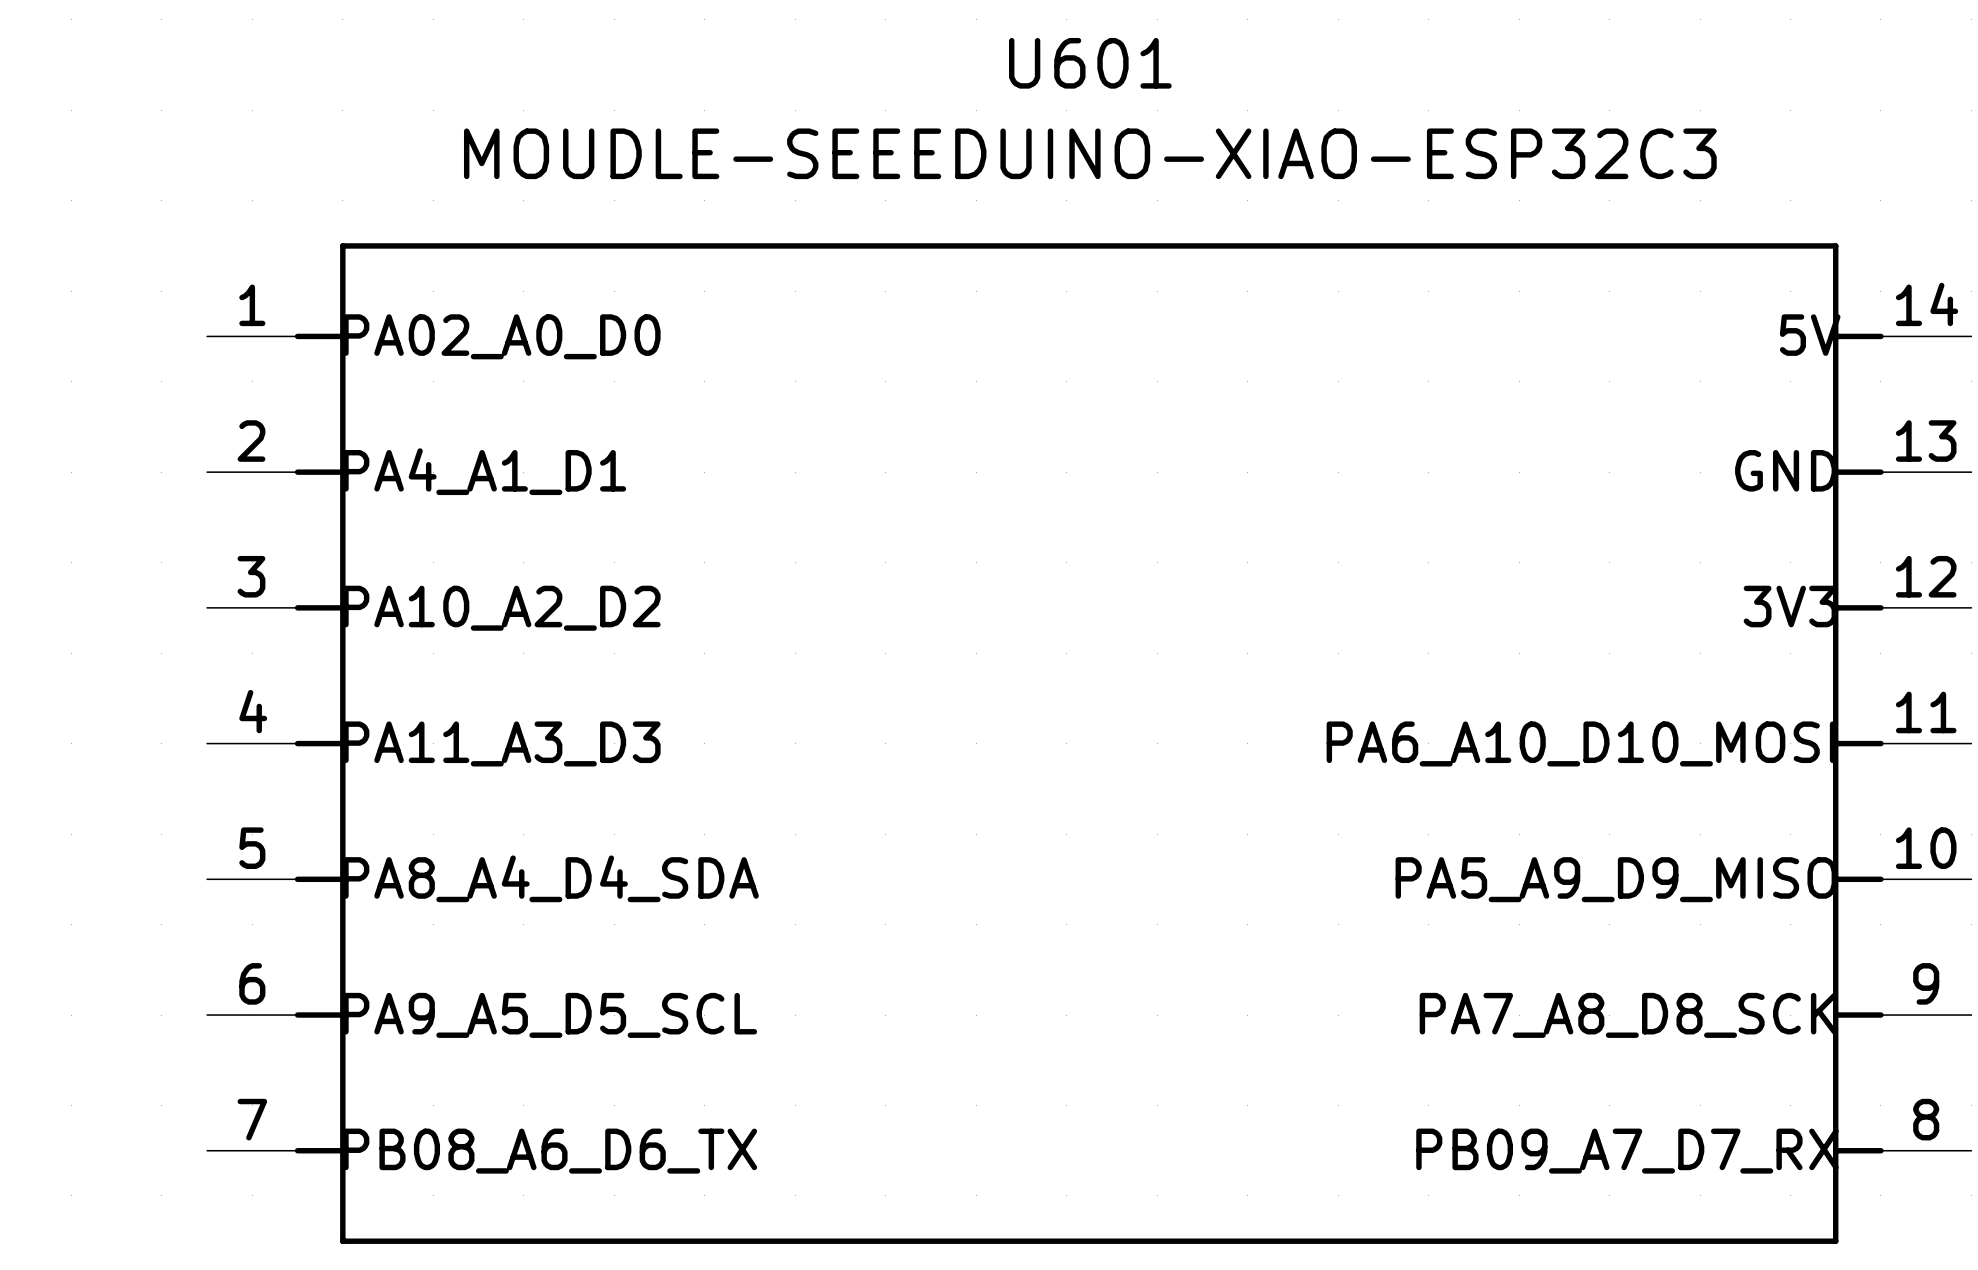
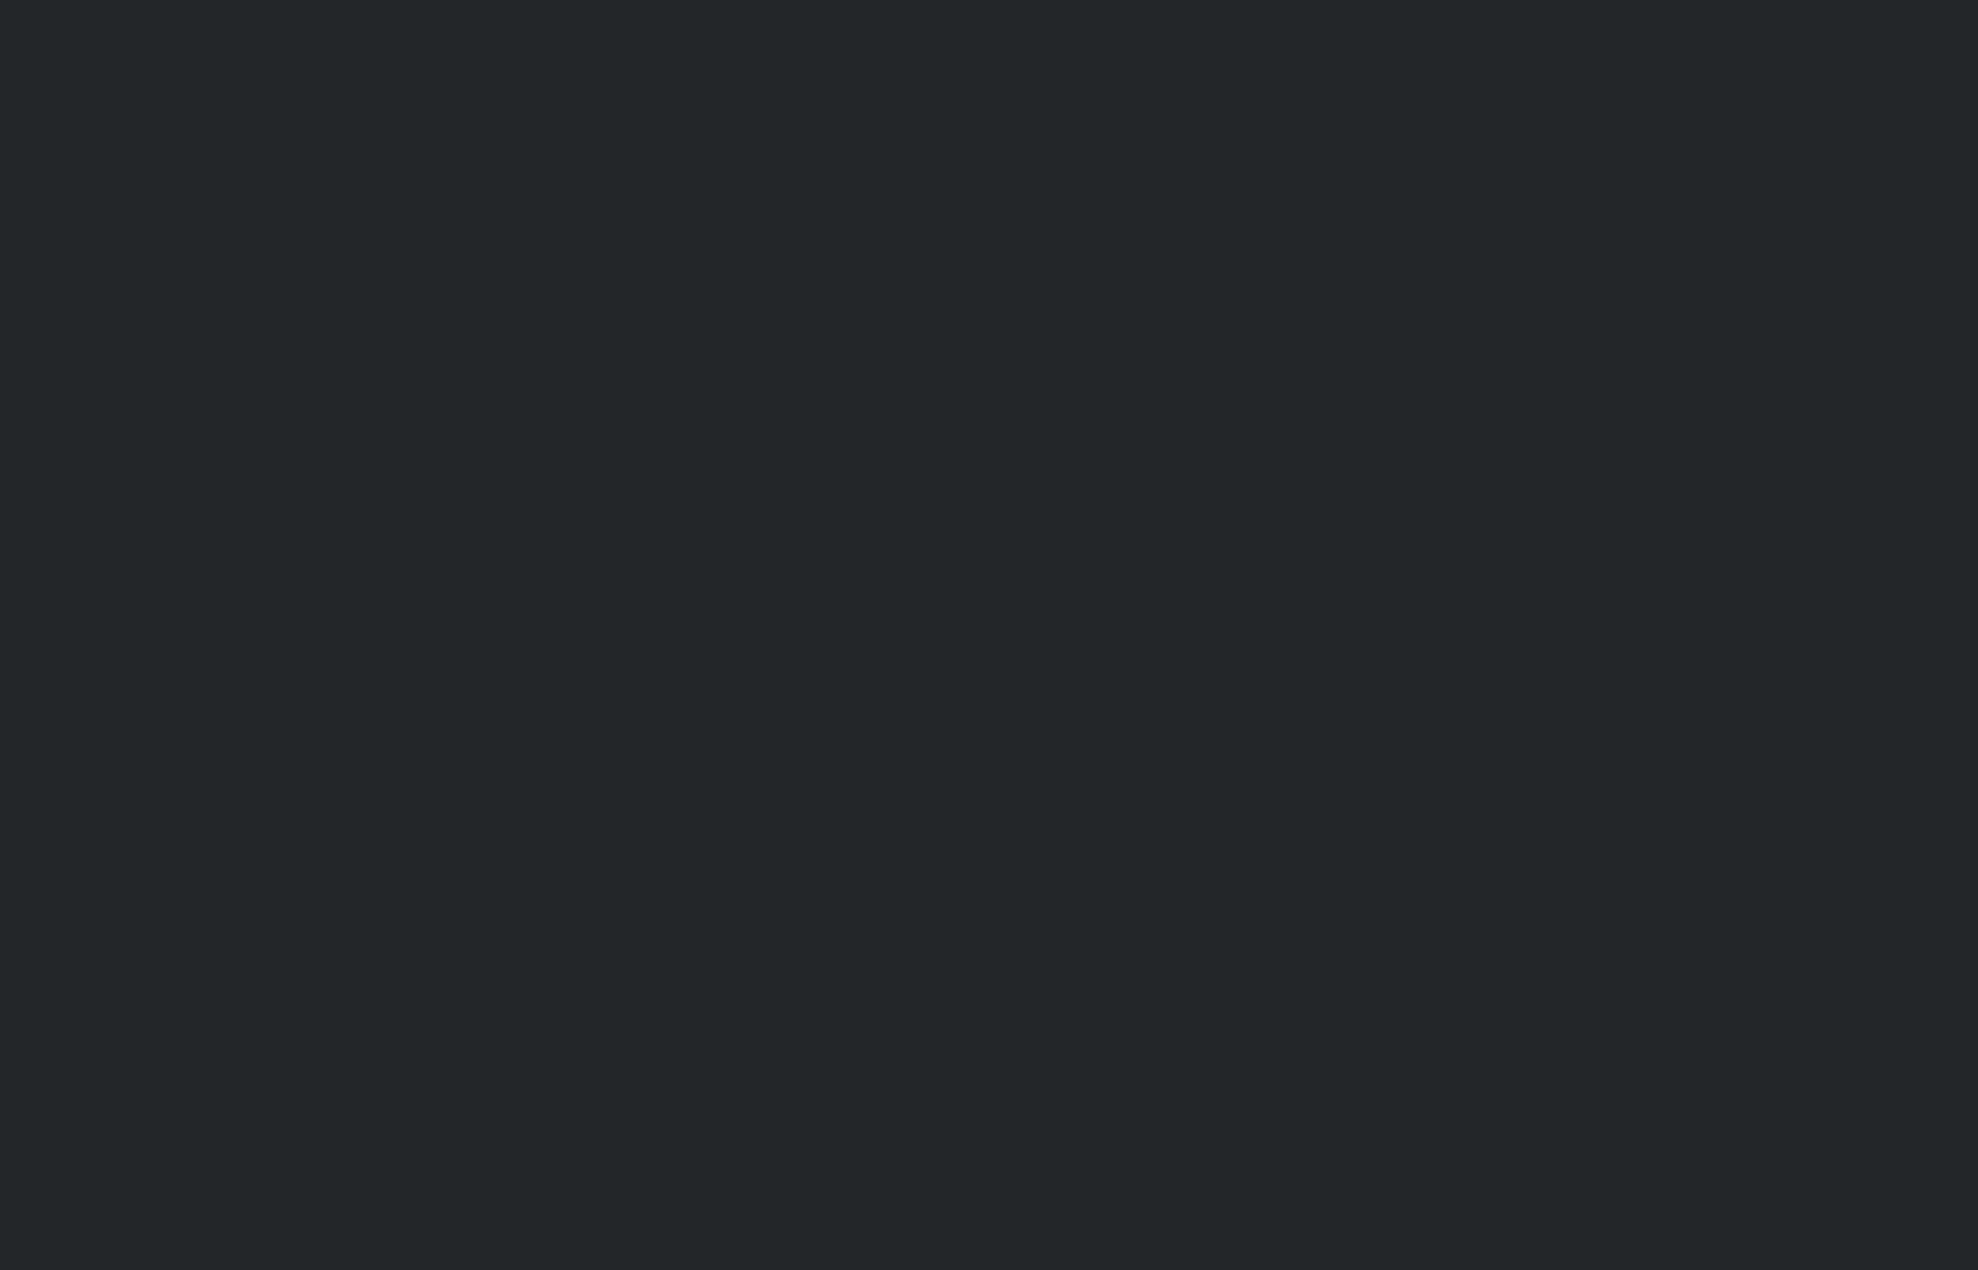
U601: MOUDLE-SEEEDUINO-XIAO-ESP32C3 (1089, 743) -> none

